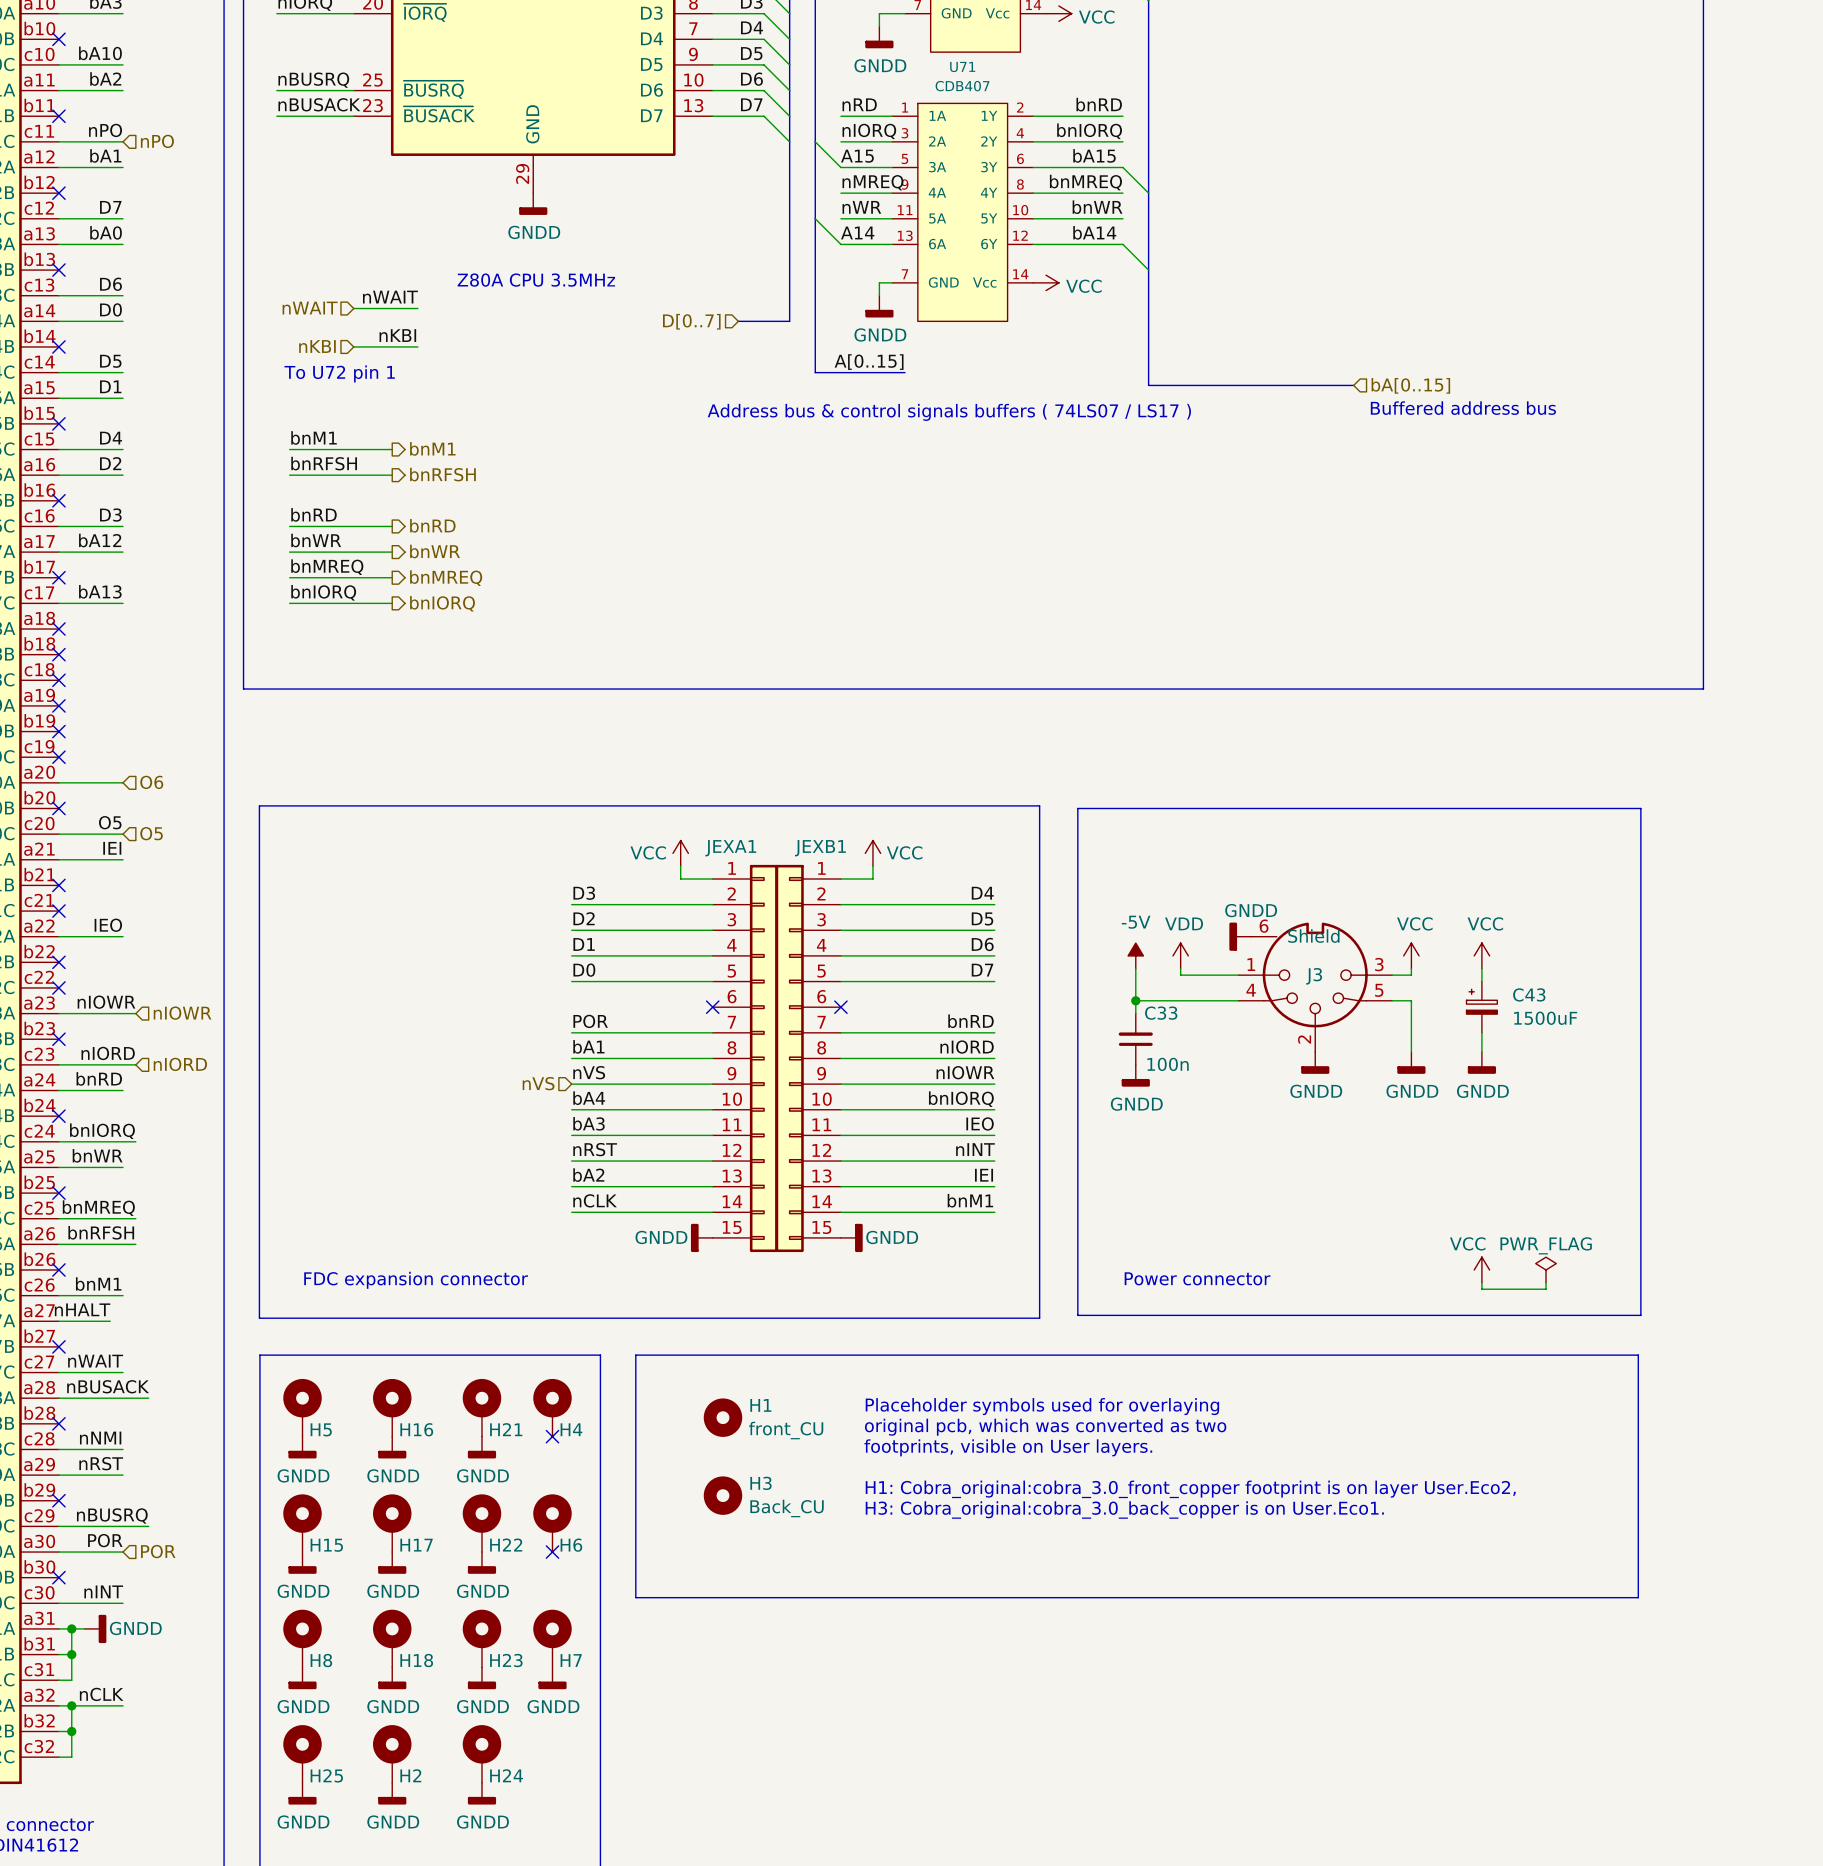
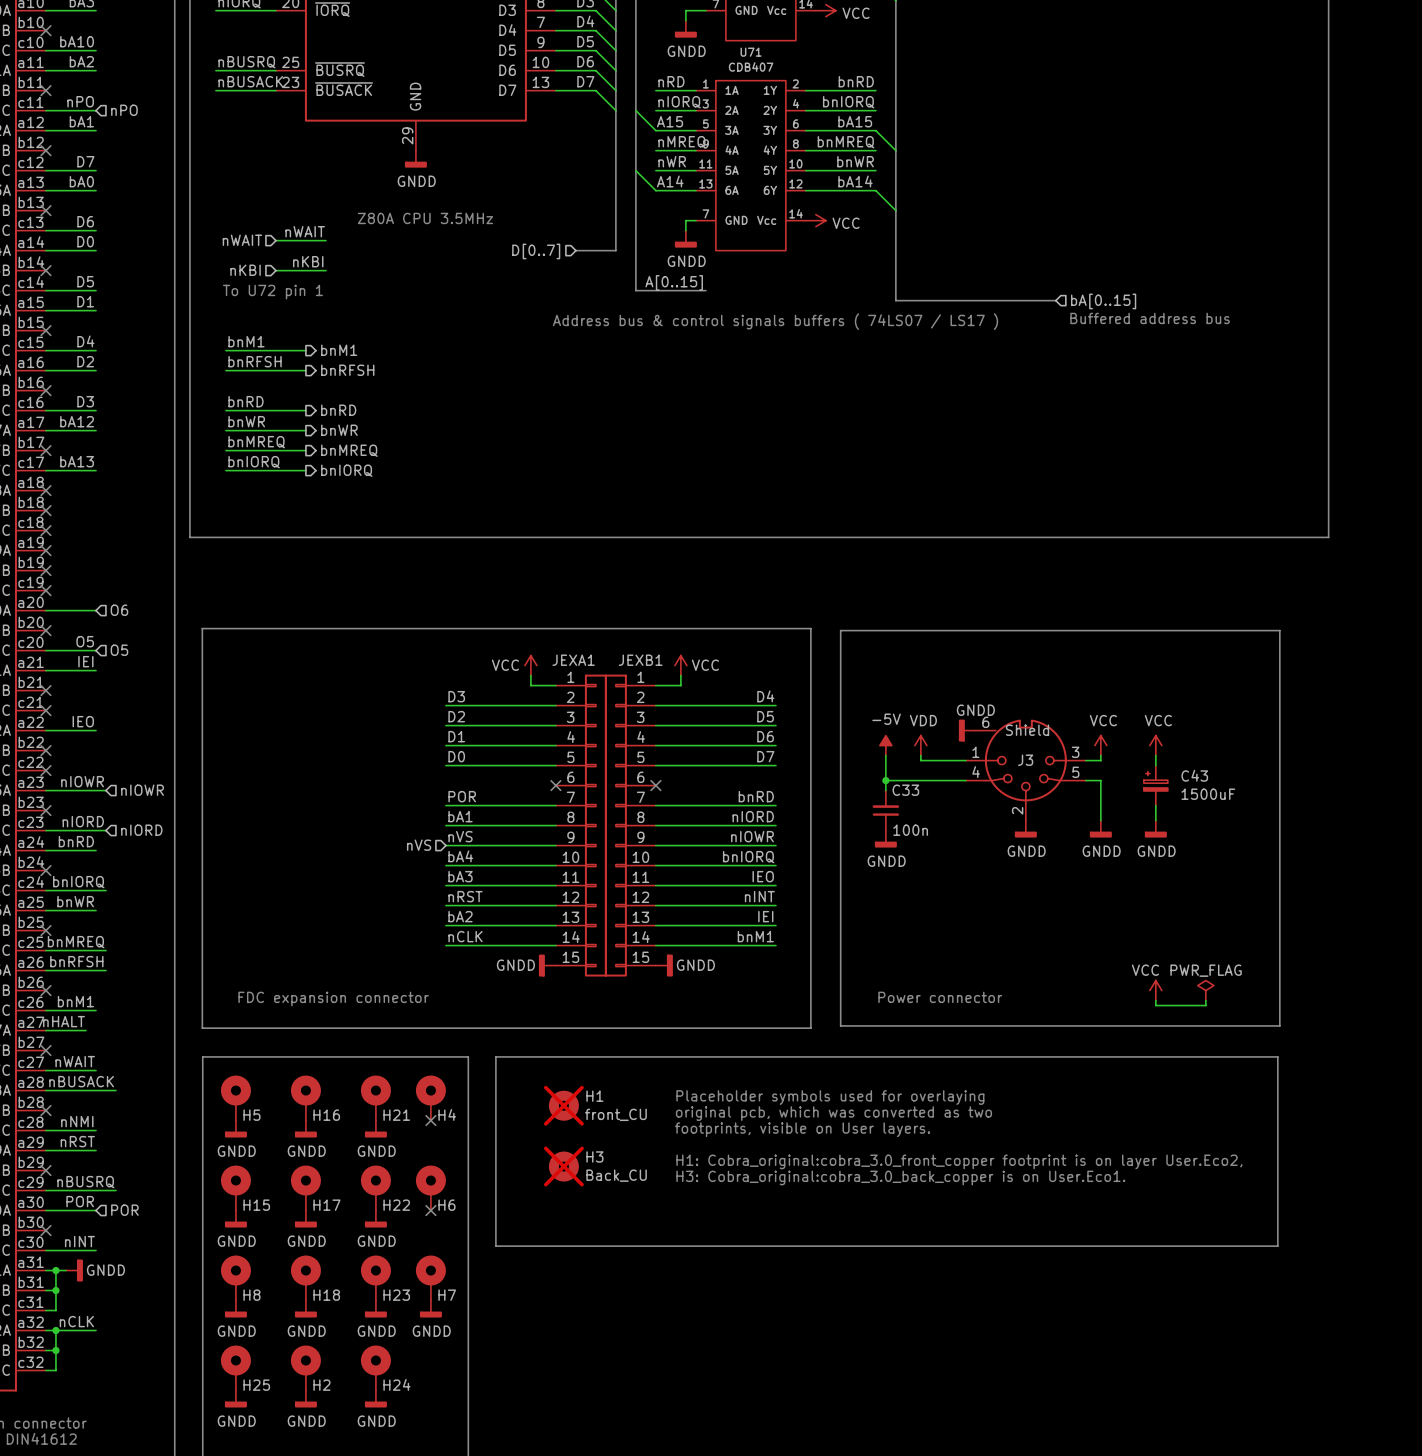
H1 do-not-place cross: none -> (563, 1105)
H3 do-not-place cross: none -> (563, 1166)

